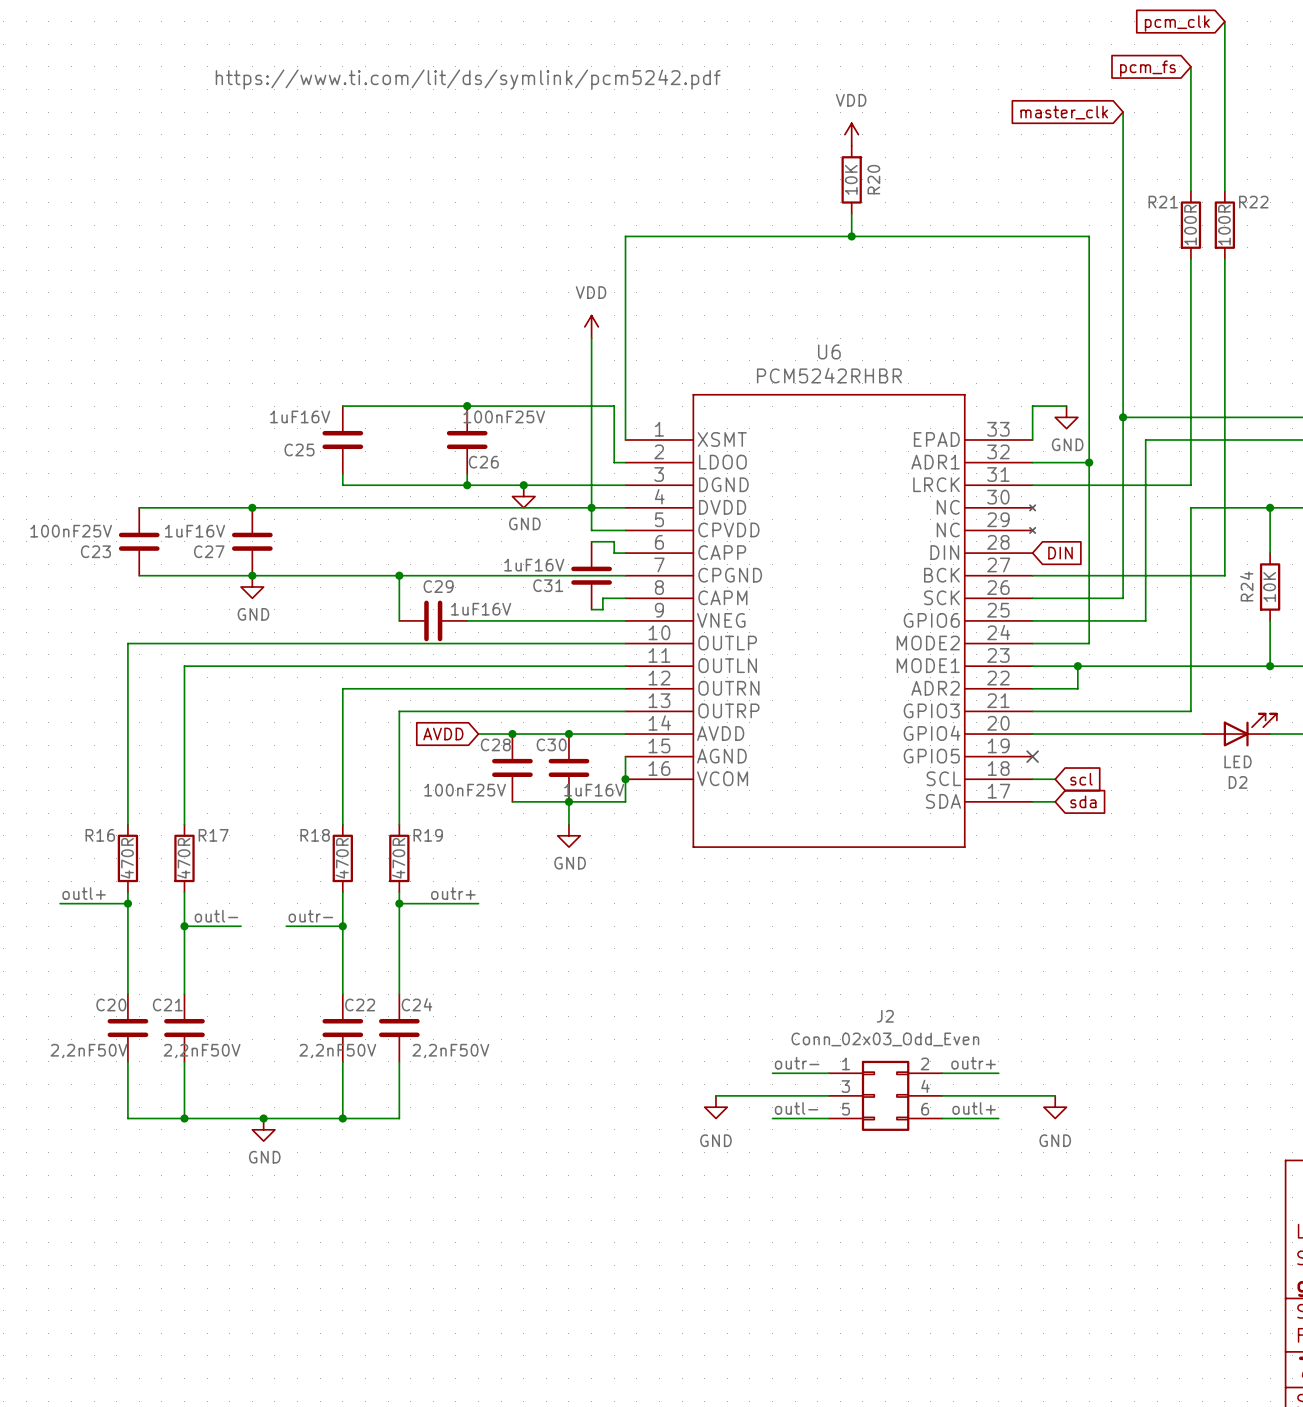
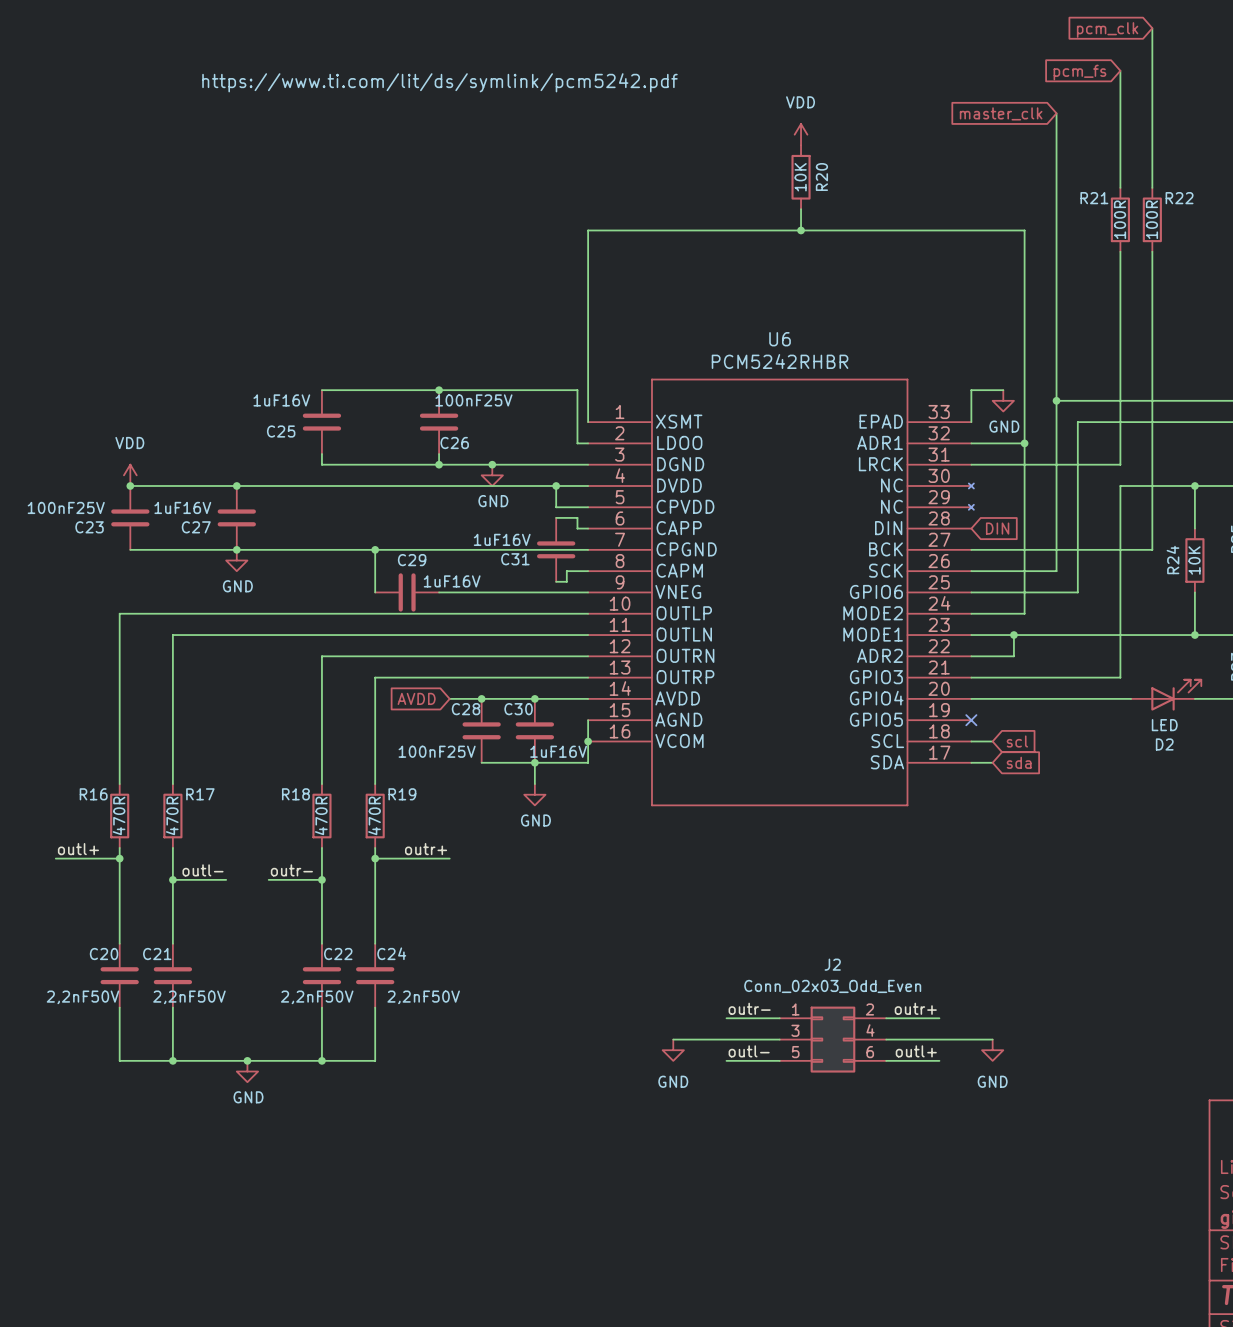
power symbol: VDD (591, 326) -> none
wire: (591, 338) (591, 507) -> none
power symbol: none -> VDD (130, 475)
junction: none -> (130, 485)

